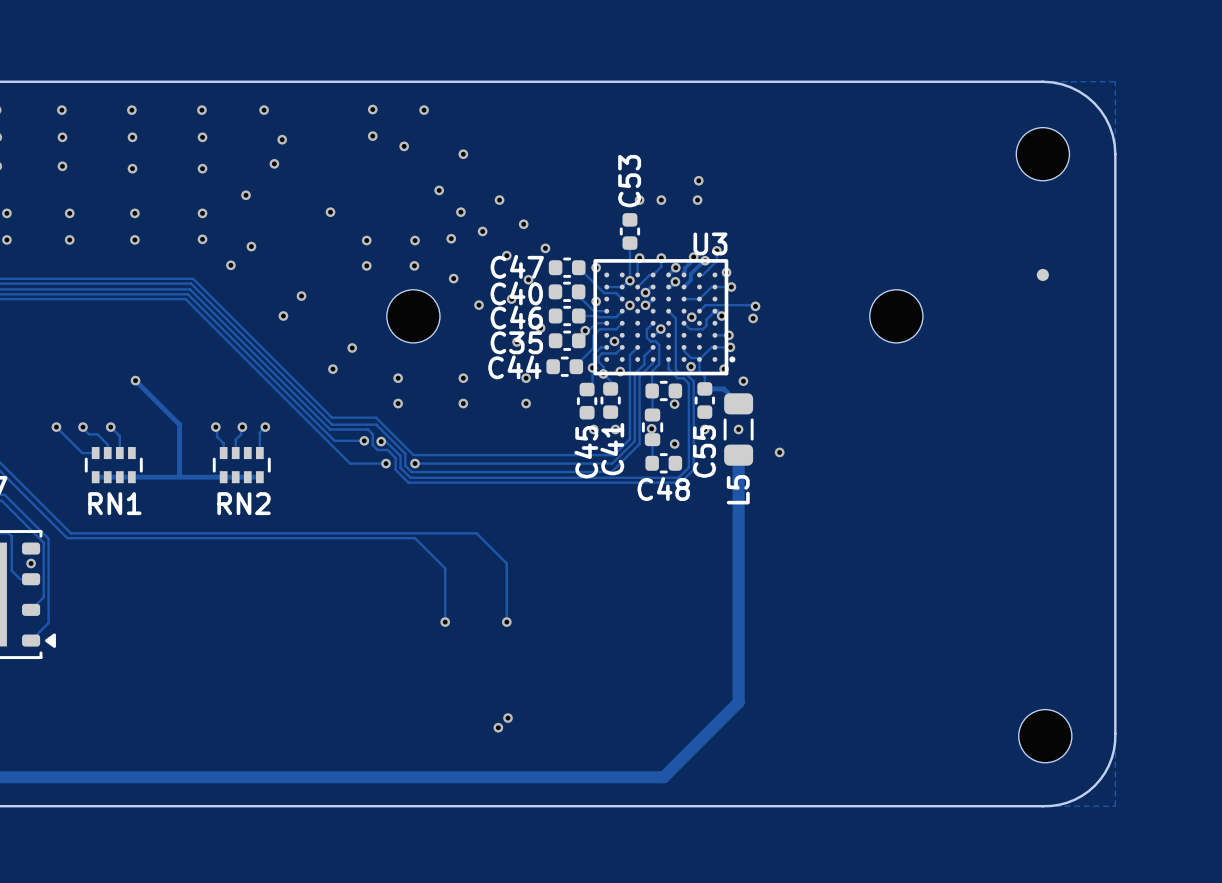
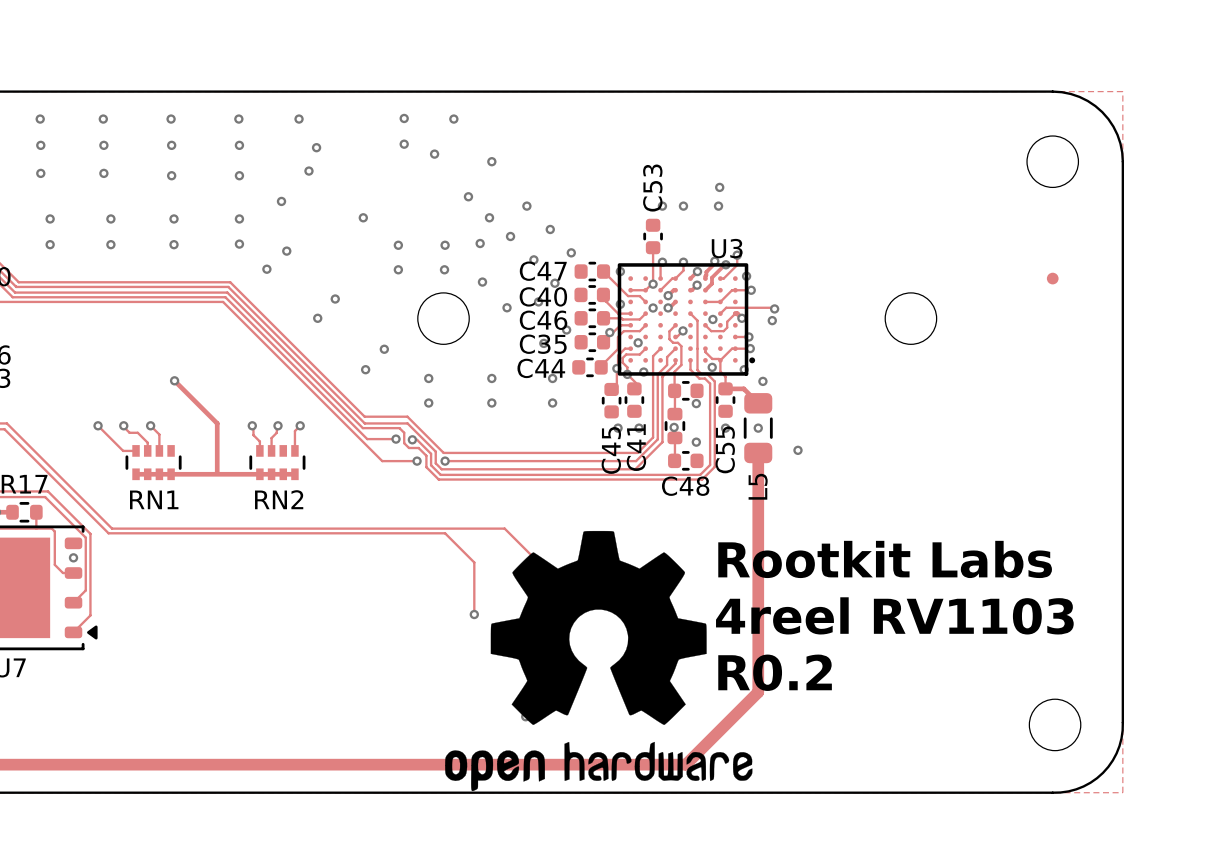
drawing: none -> [445, 530, 753, 792]
text: none -> Rootkit Labs (885, 559)
text: none -> 4reel RV1103 (894, 615)
text: none -> R0.2 (775, 672)

